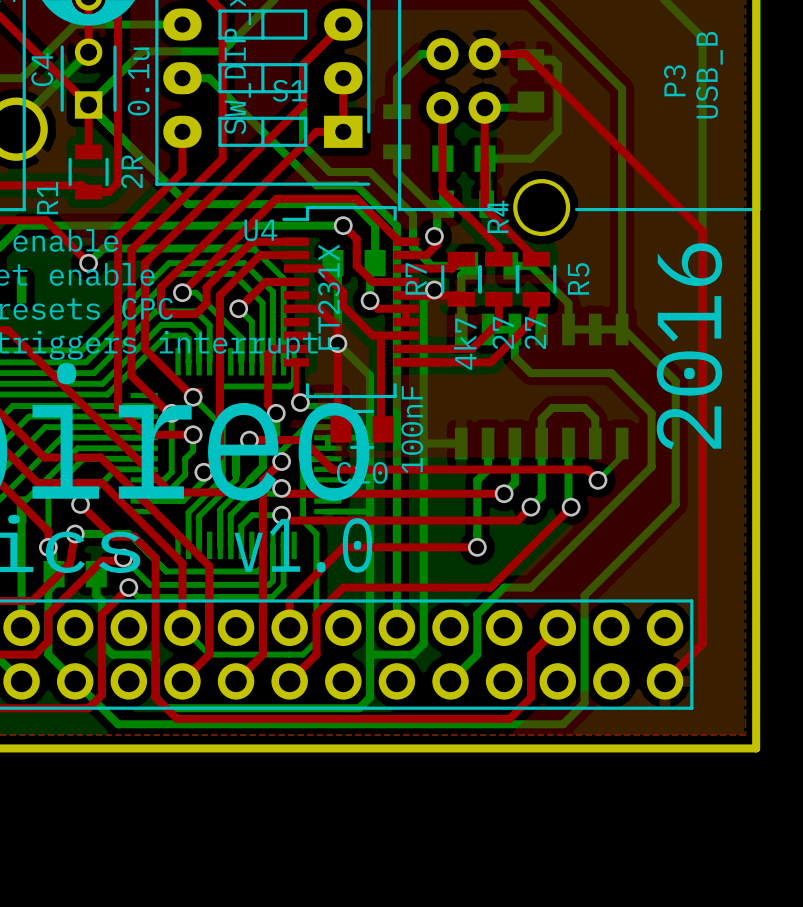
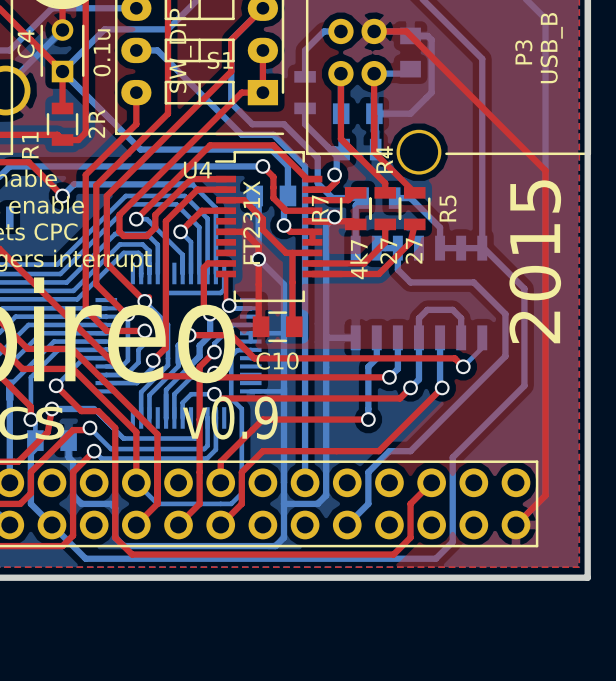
text: 2016 (689, 346) -> 2015 (535, 261)
C10 value: 100nF (412, 429) -> none
text: v1.0 (303, 545) -> v0.9 (230, 418)

